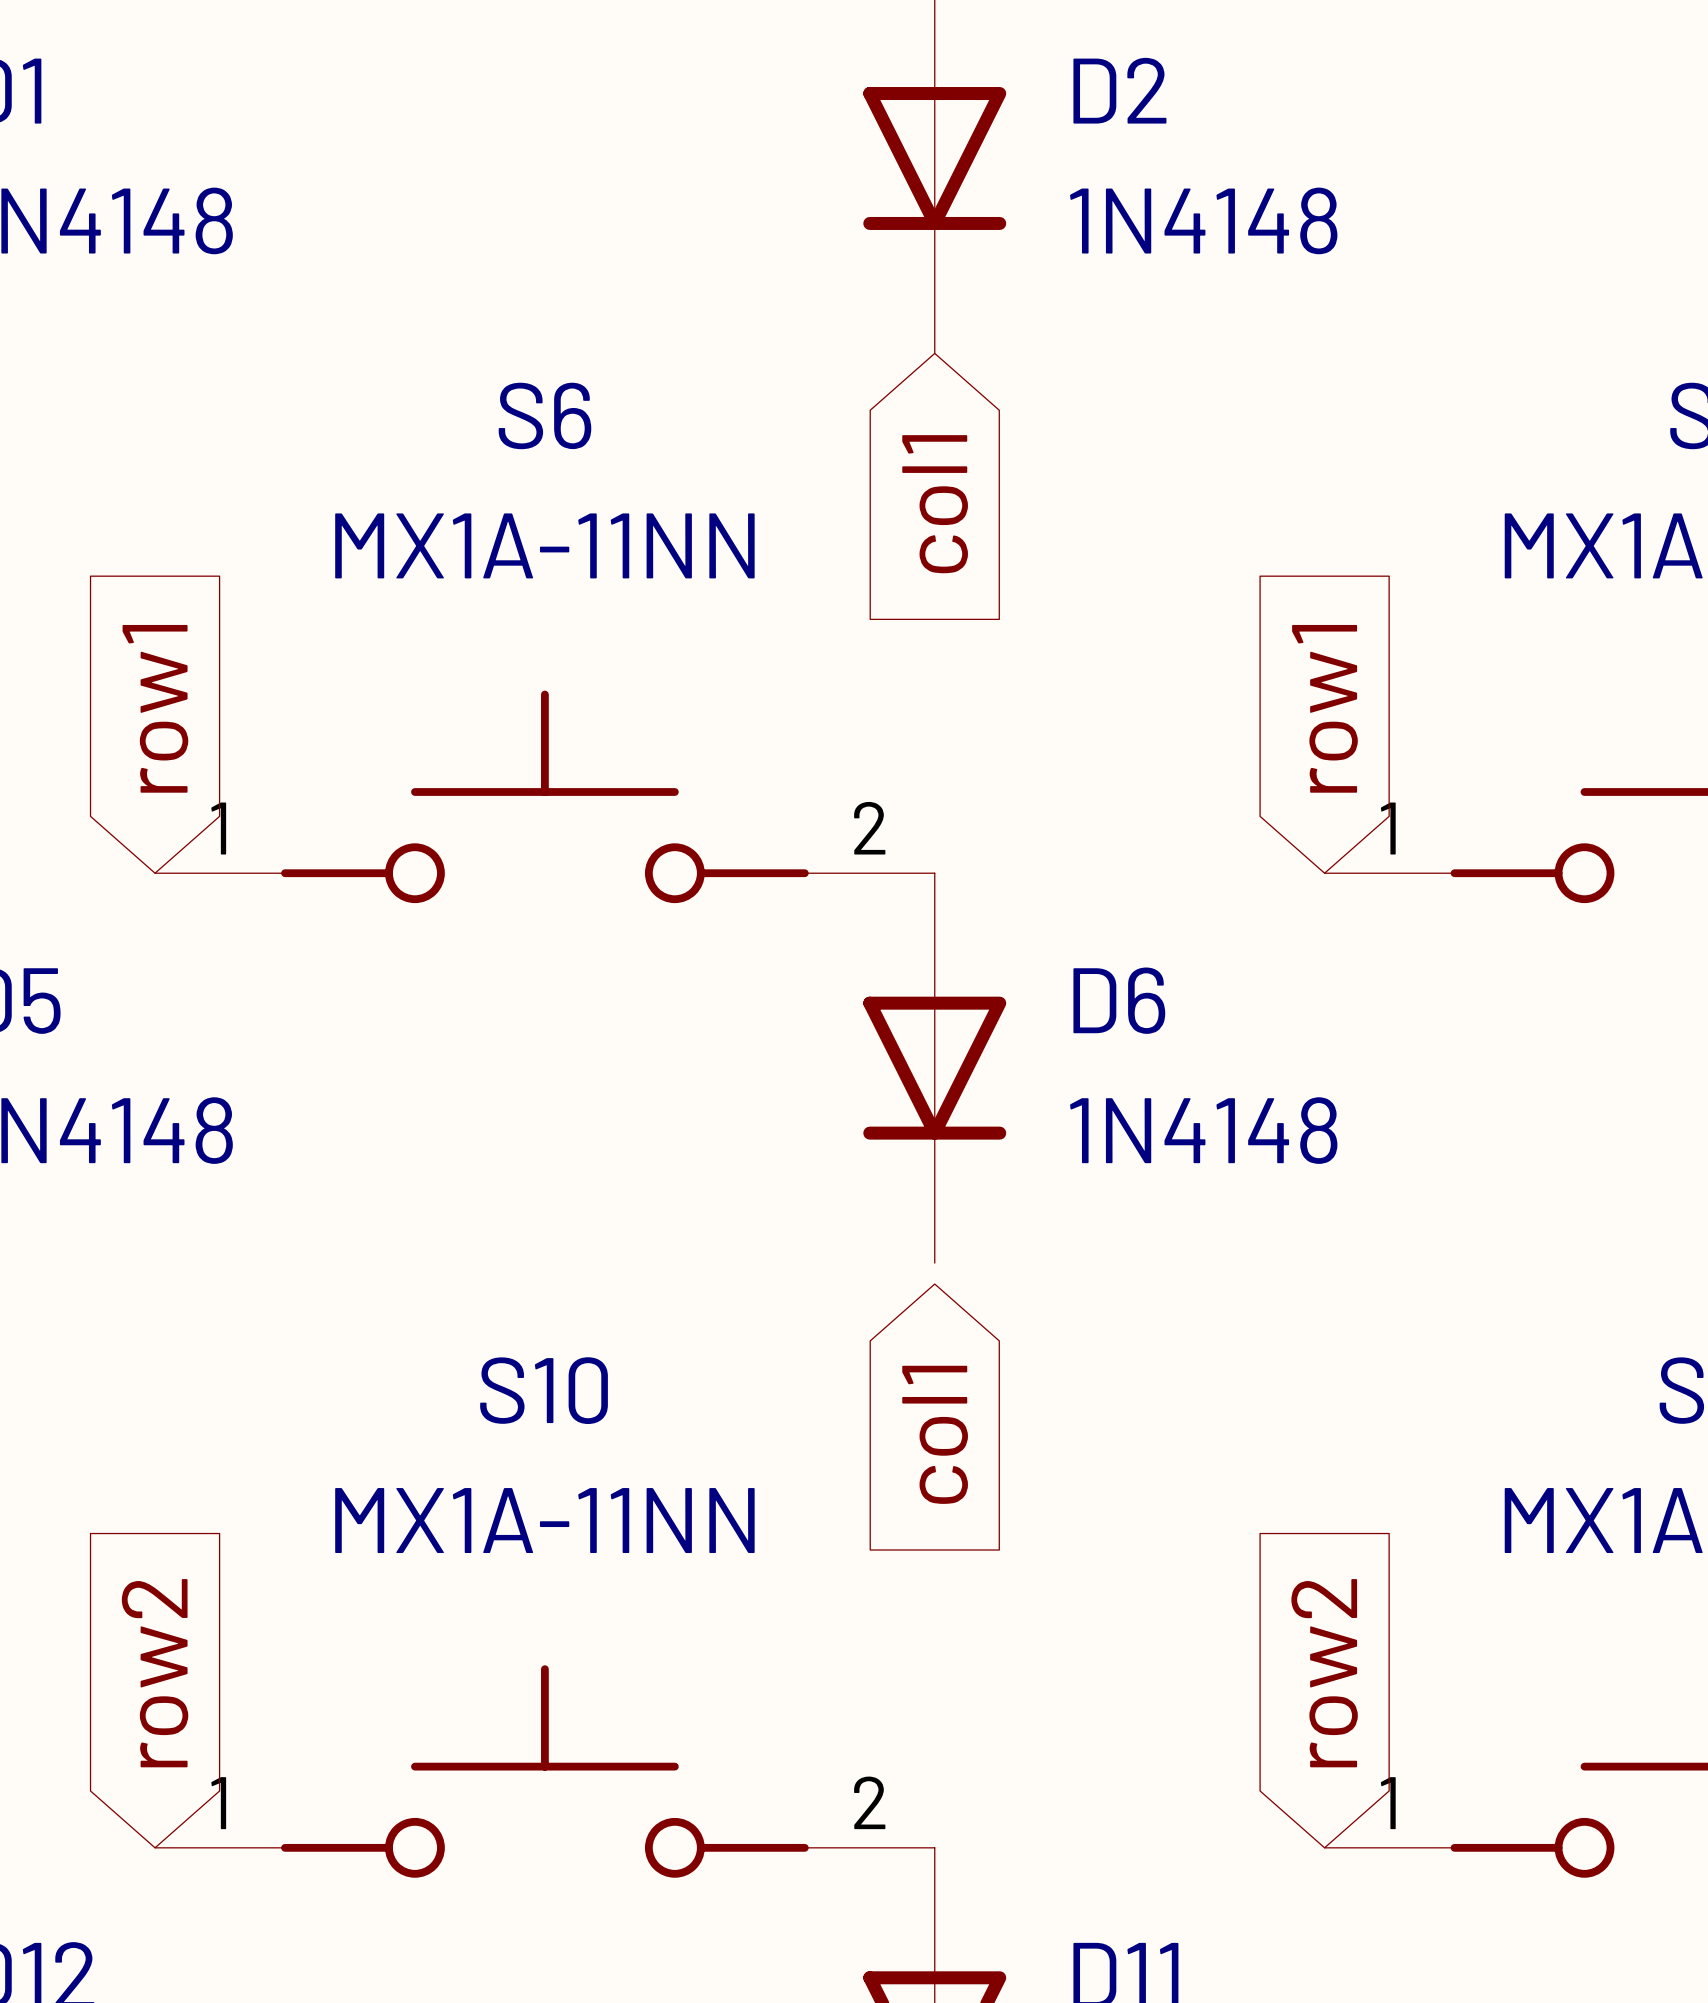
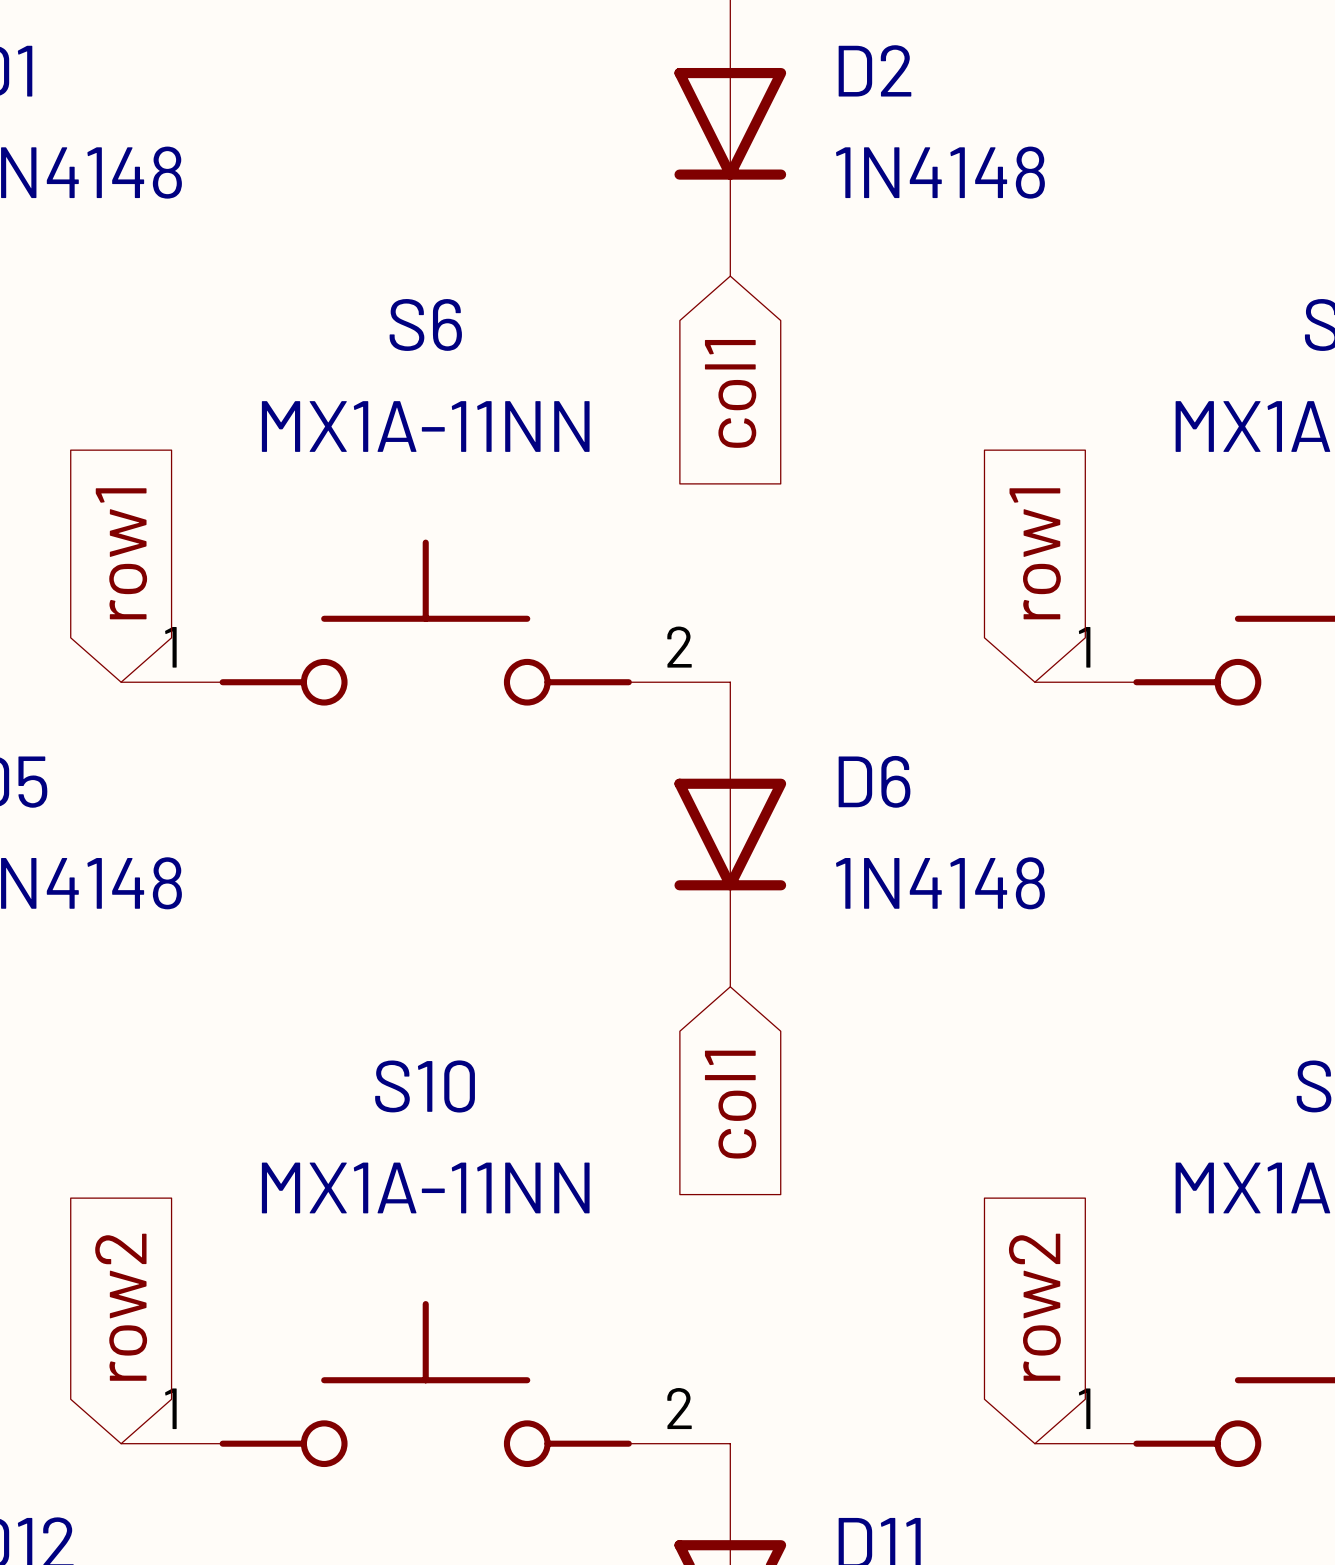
global label position: col1 (935, 1434) -> col1 (730, 1104)

